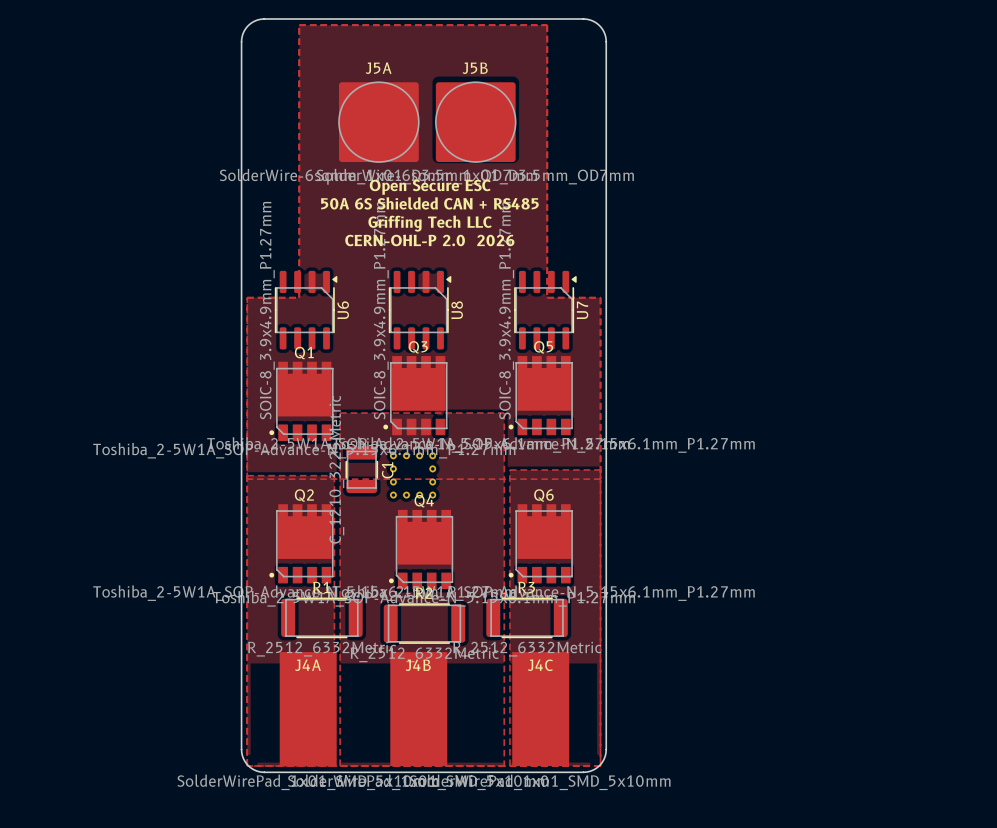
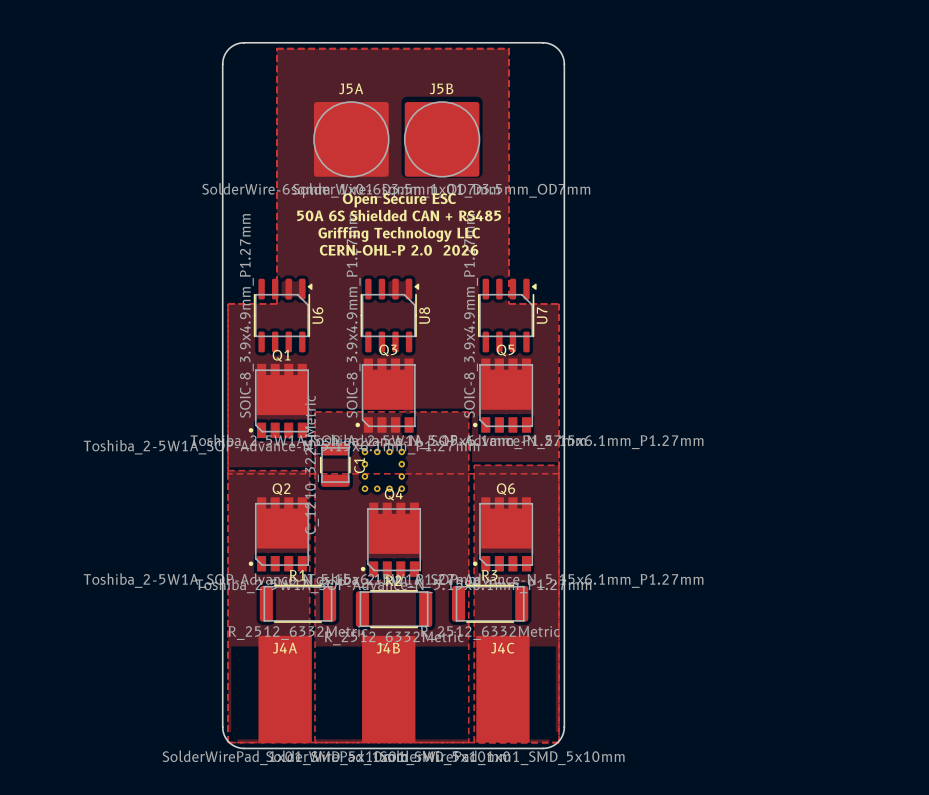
text: Griffing Tech LLC (430, 223) -> Griffing Technology LLC (399, 234)

